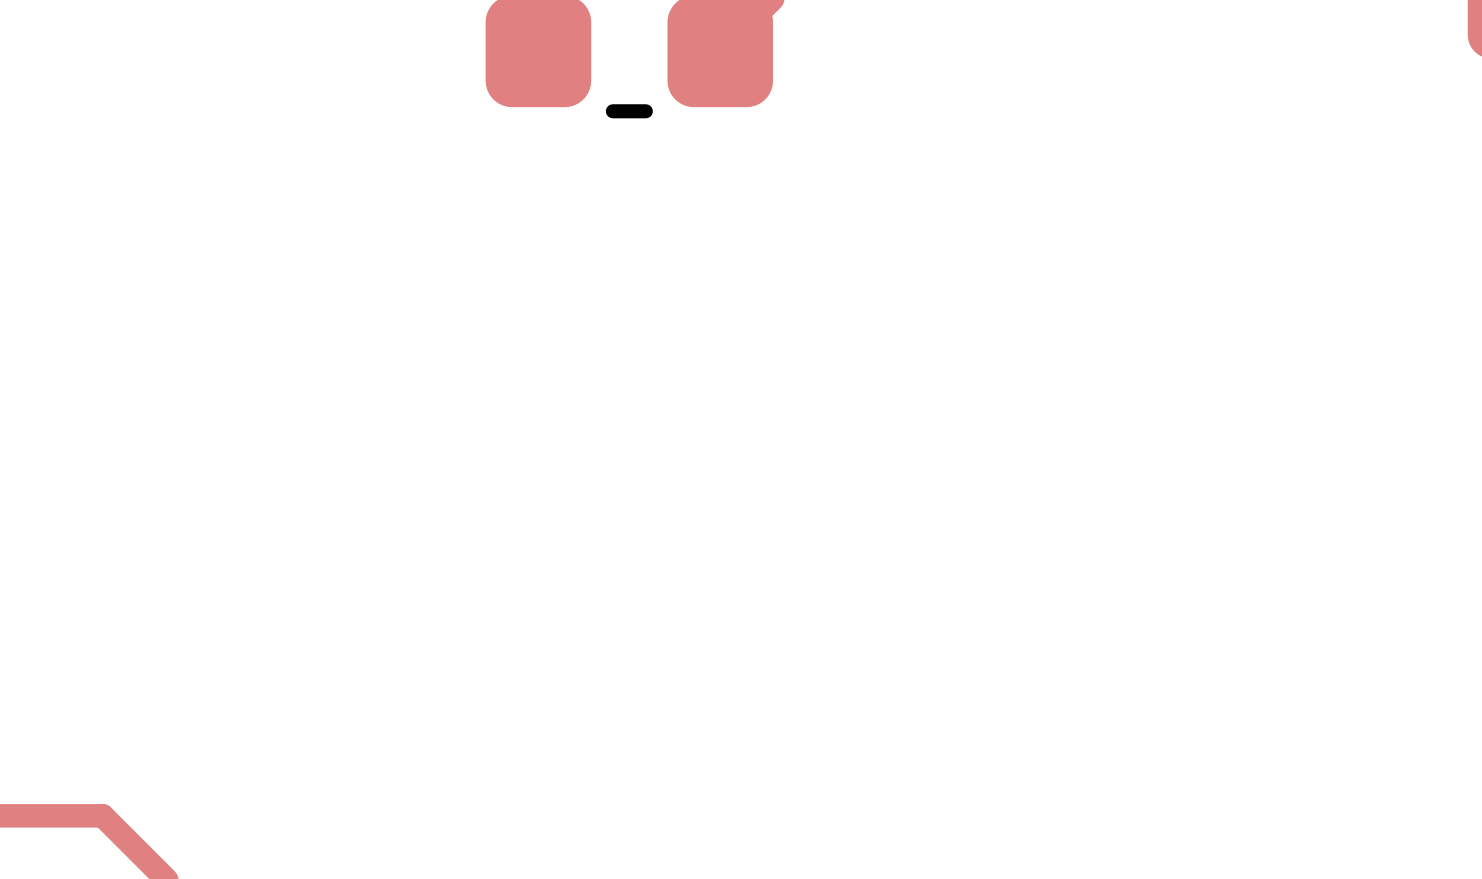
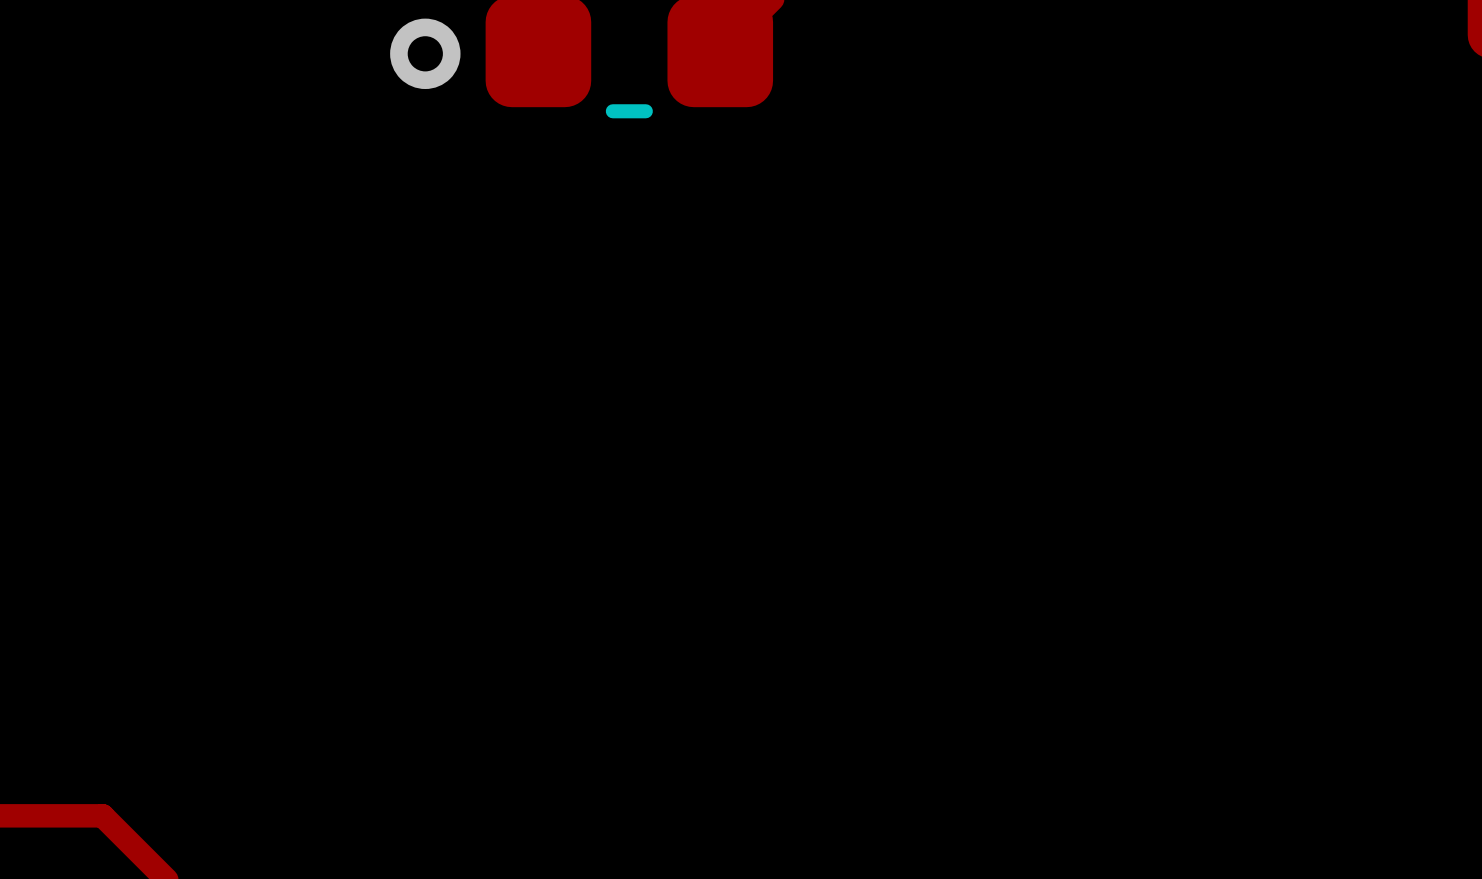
via: none -> (425, 53)

